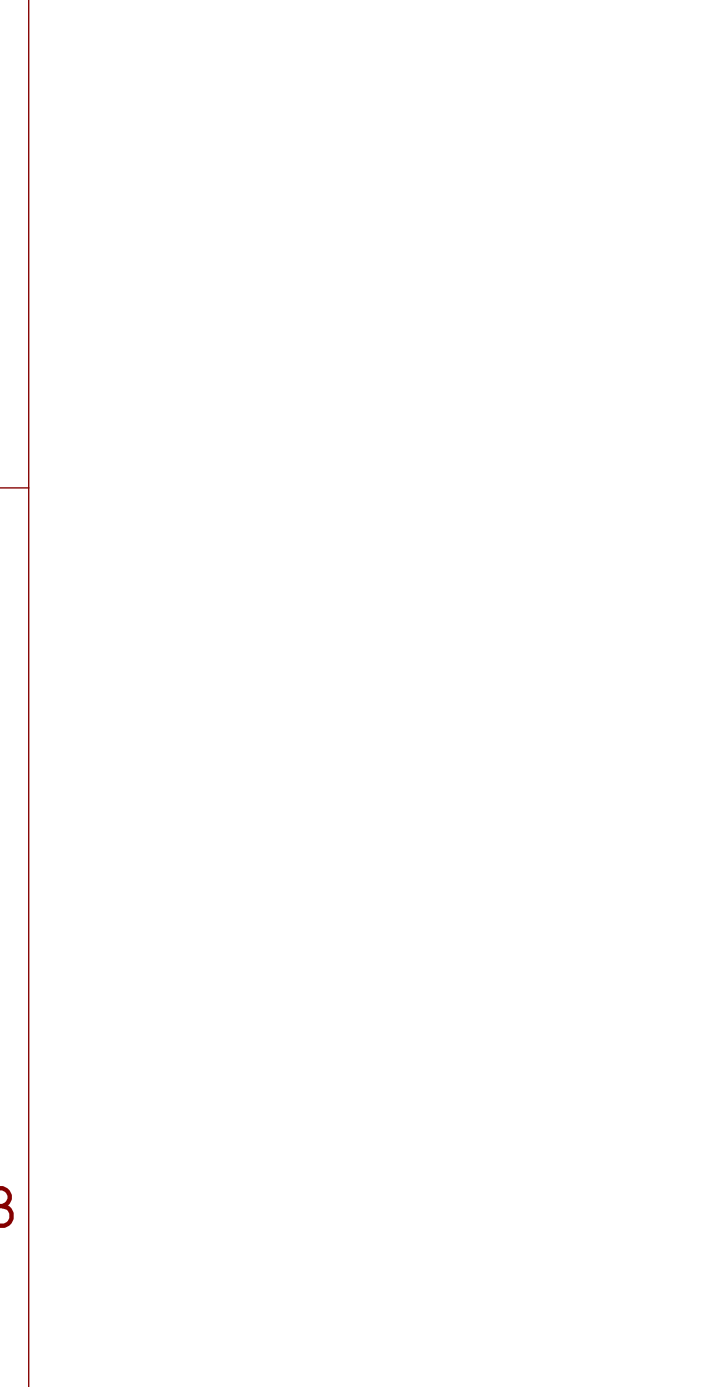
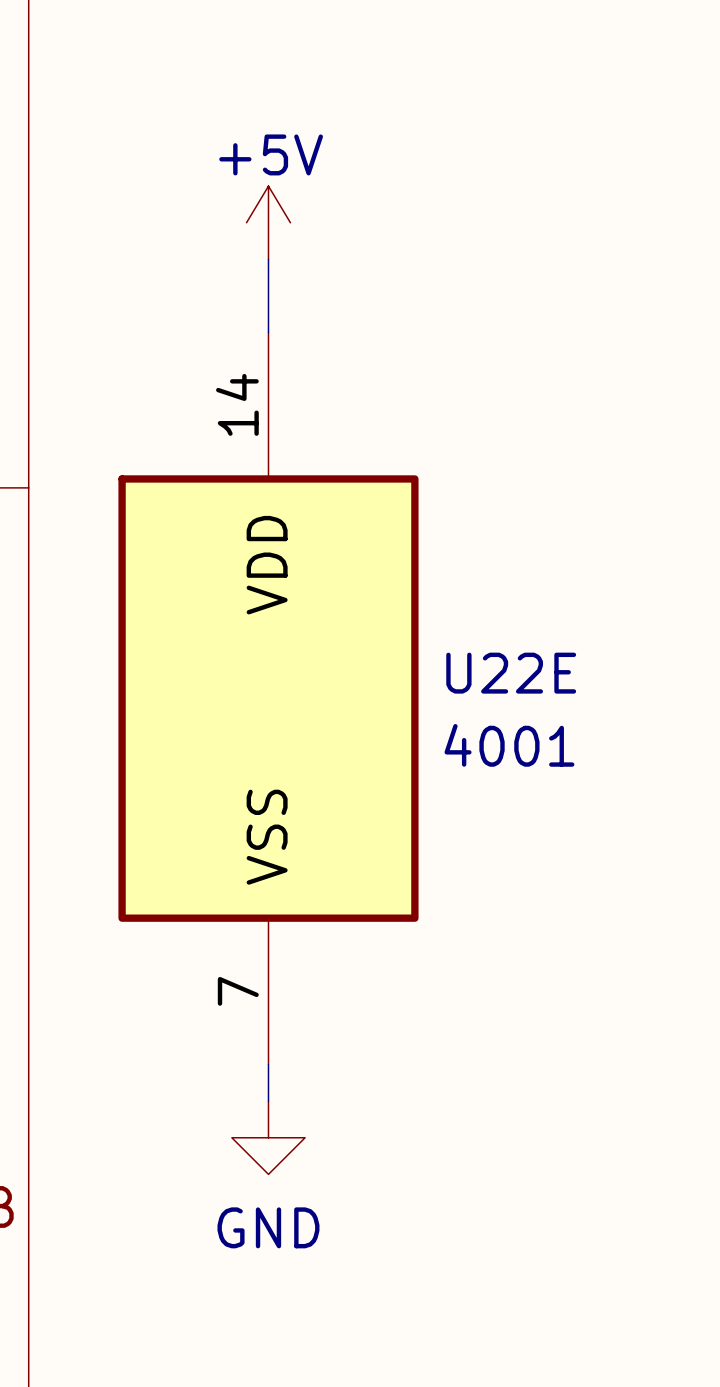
power symbol: none -> +5V (268, 222)
wire: none -> (268, 259) (268, 332)
U22E: none -> 4001 (268, 698)
wire: none -> (268, 1064) (268, 1101)
power symbol: none -> GND (268, 1137)

